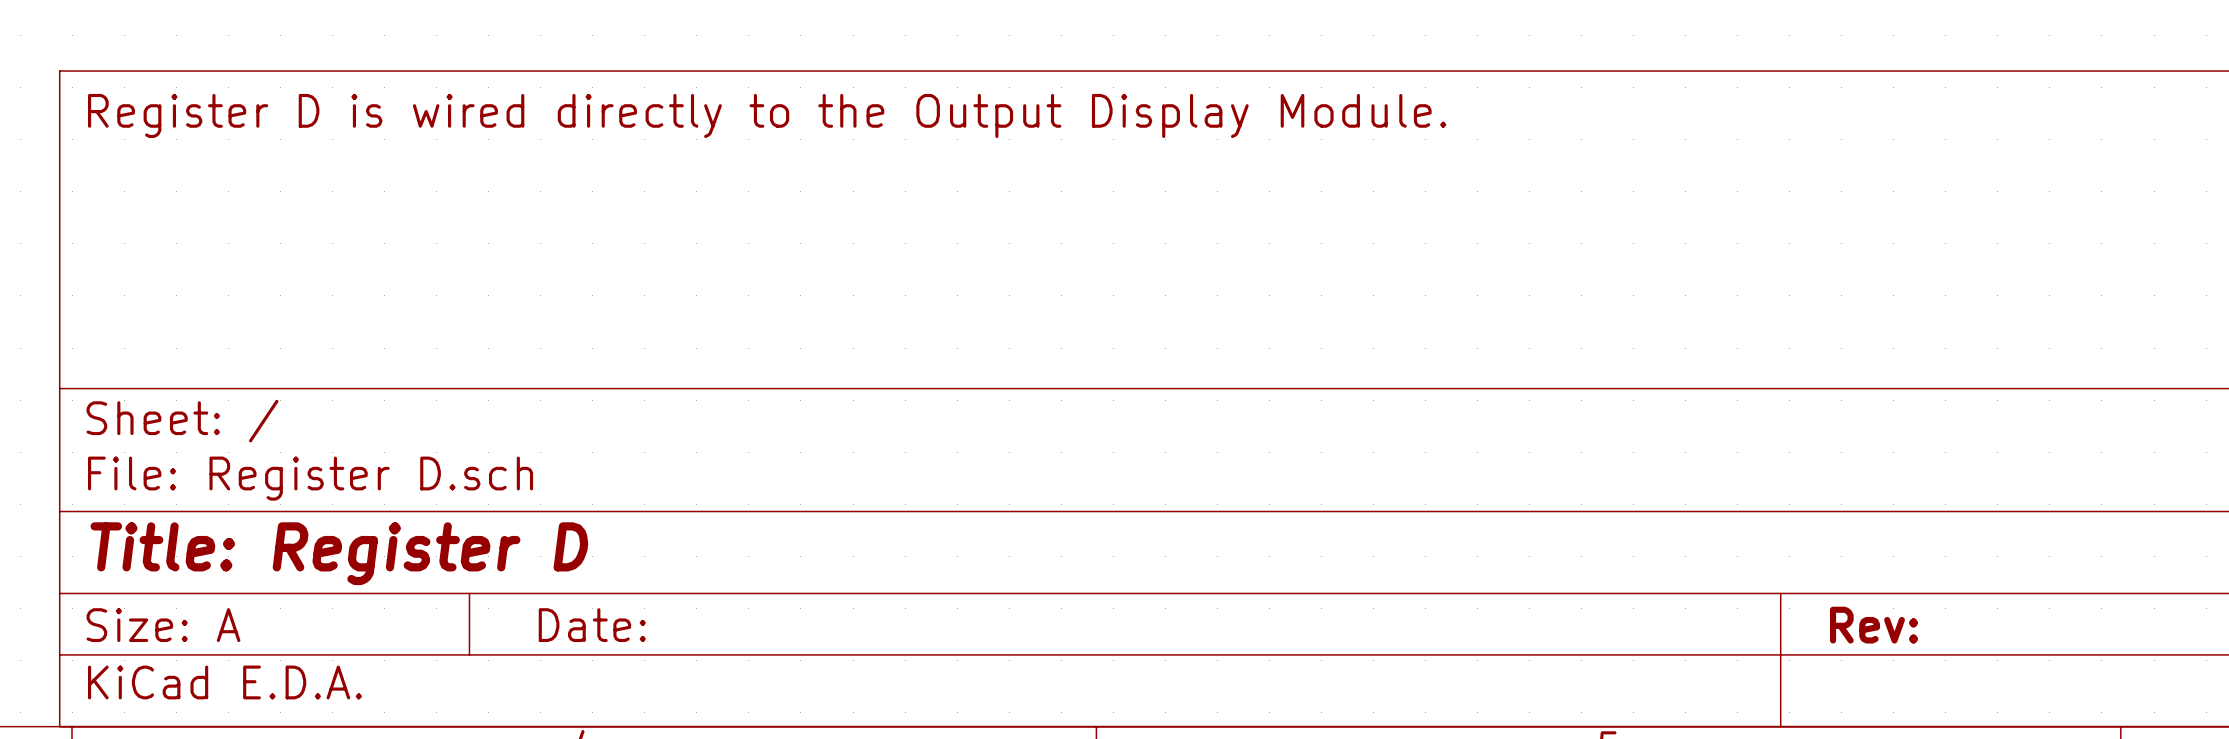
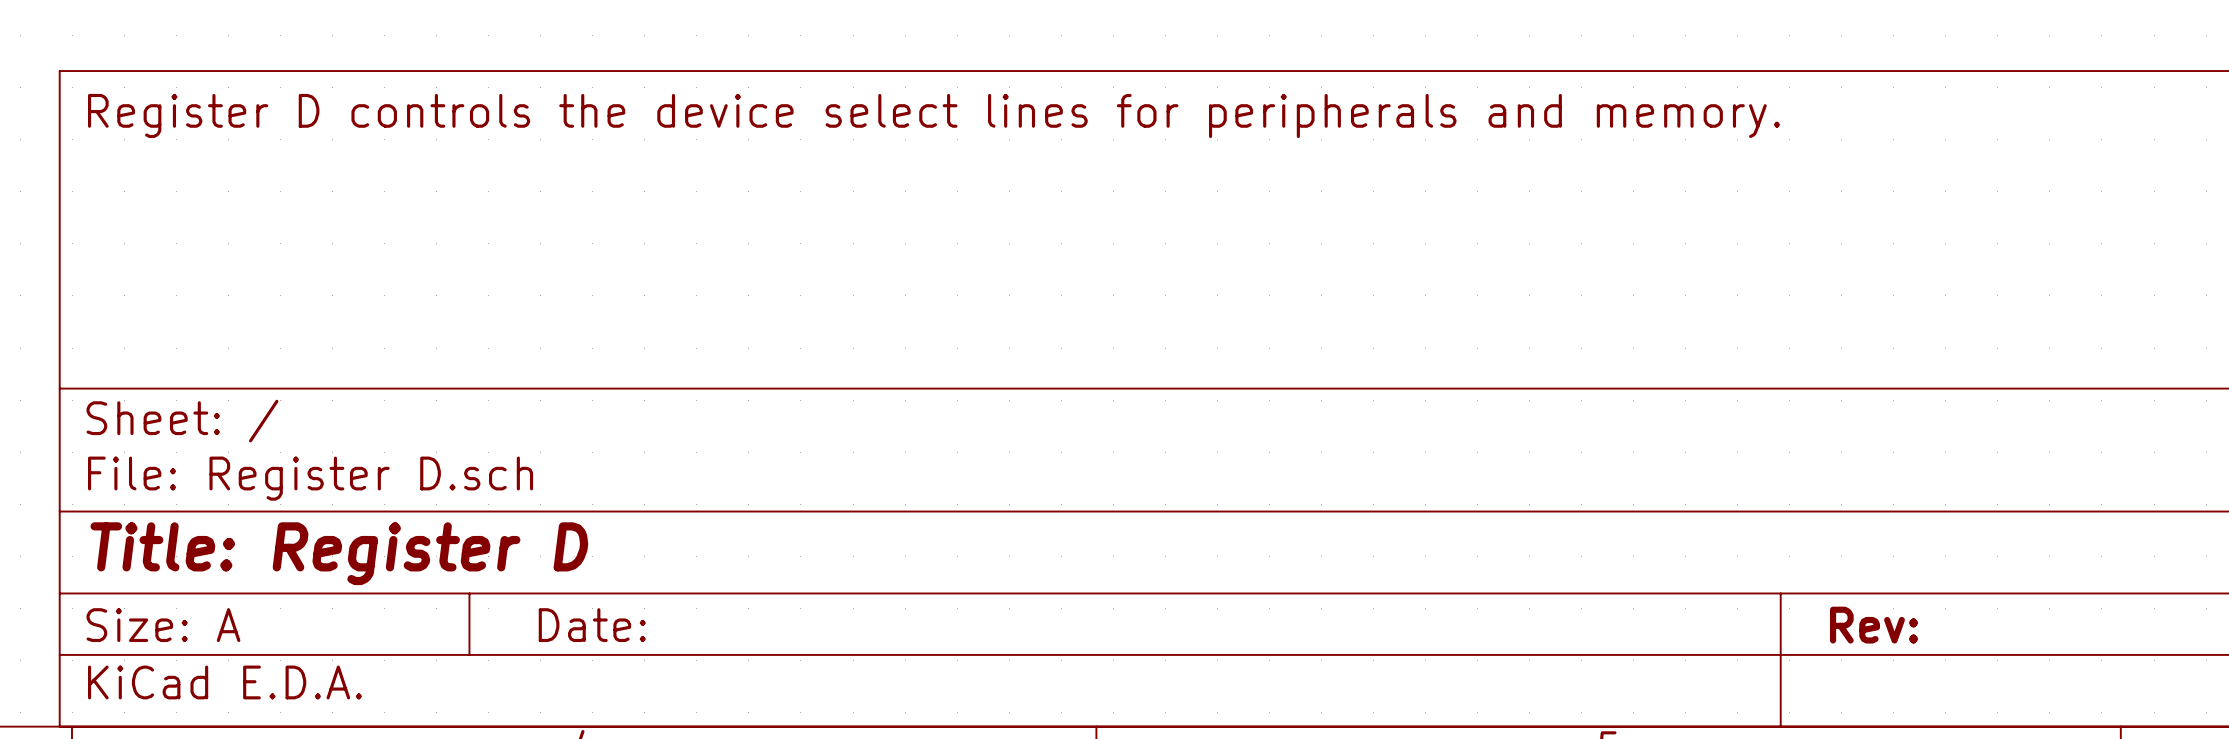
title block: Register D is wired directly to the Output Display Module. (767, 115) -> Register D controls the device select lines for peripherals and memory. (933, 115)

